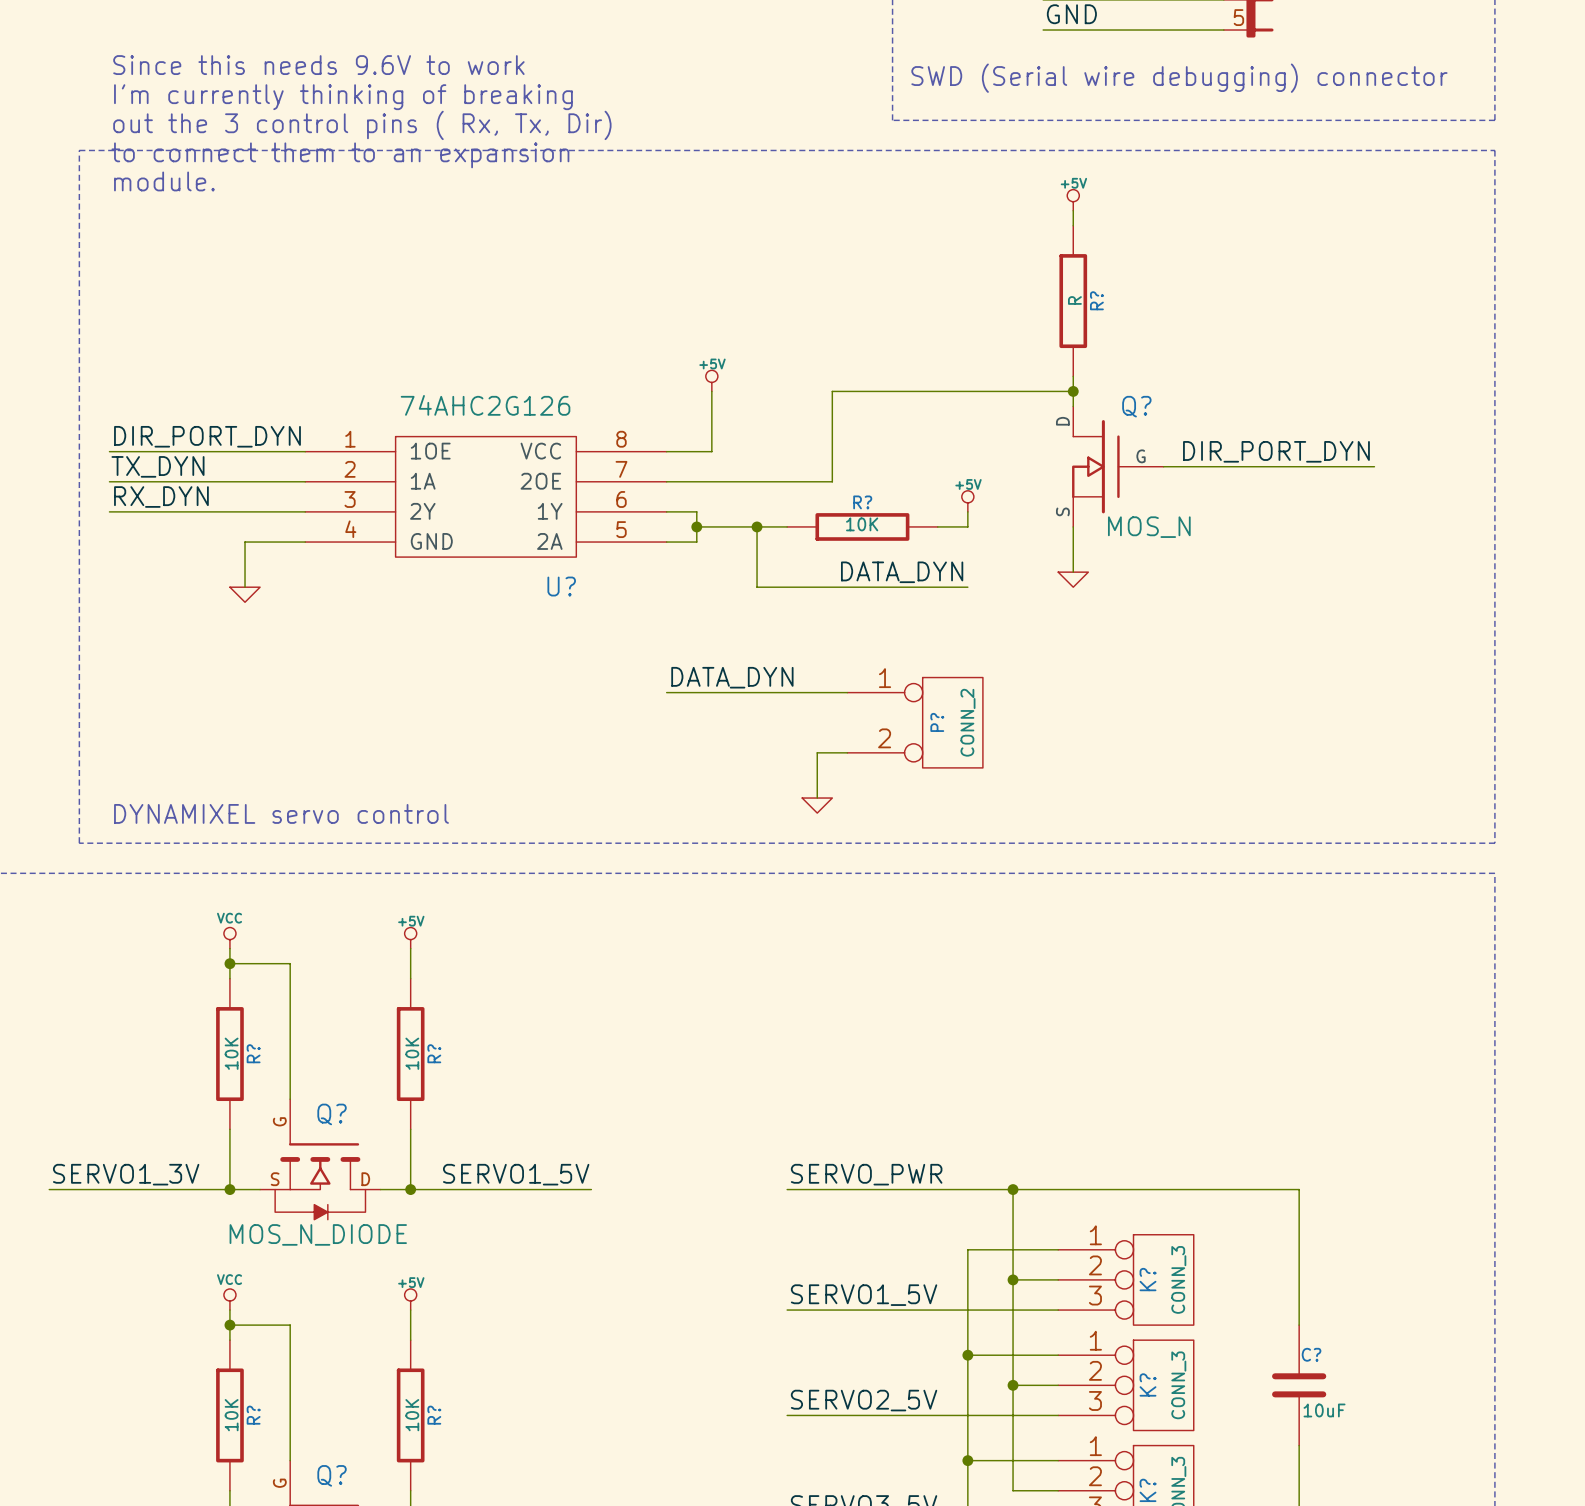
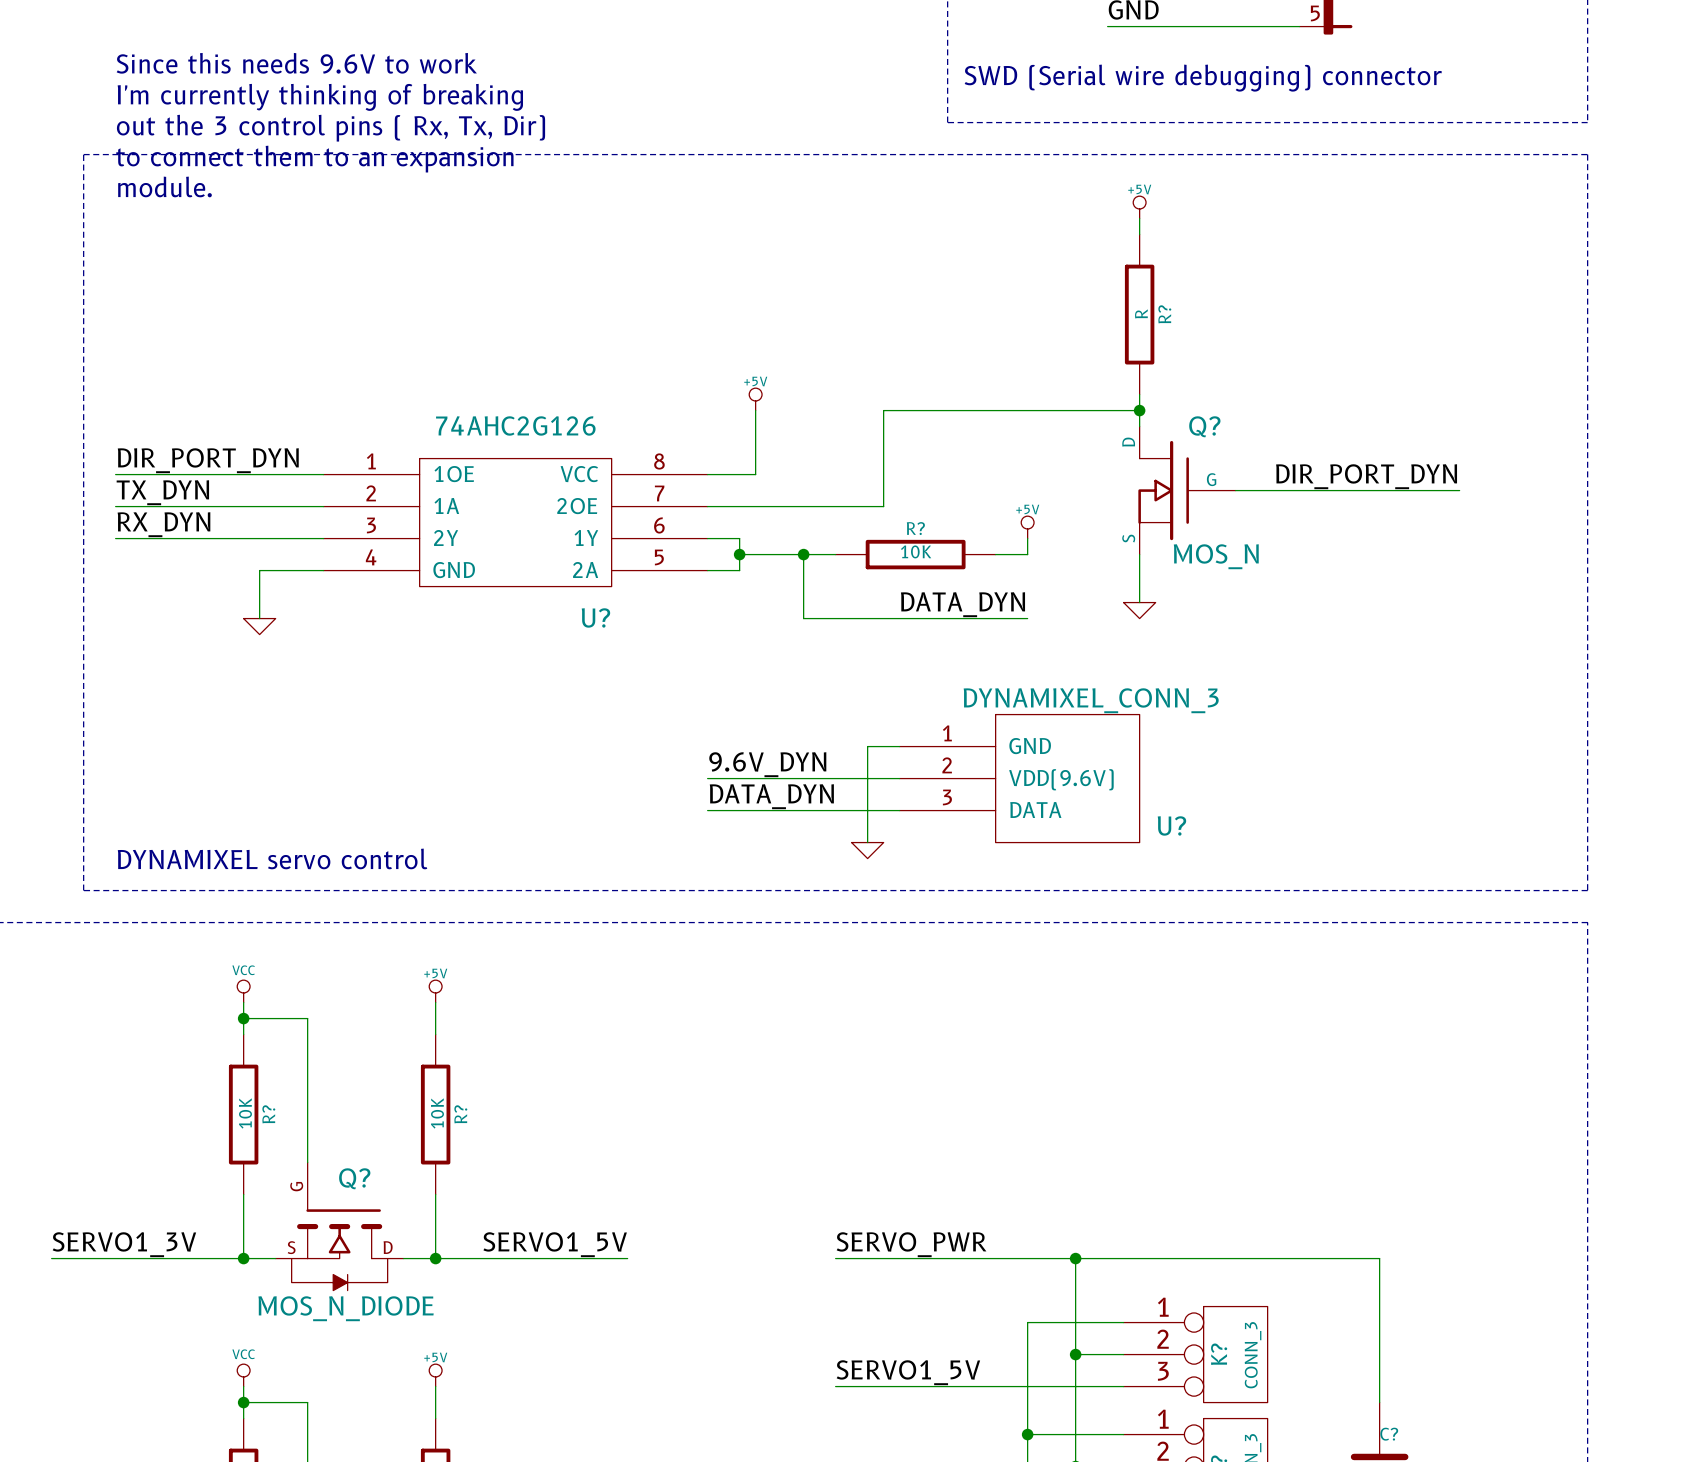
label position: DATA_DYN (732, 677) -> DATA_DYN (771, 796)
wire: (666, 692) (847, 692) -> (707, 778) (899, 778)
label: none -> 9.6V_DYN (767, 764)
P?: CONN_2 (915, 722) -> none
U?: none -> DYNAMIXEL_CONN_3 (1019, 778)
wire: (817, 752) (847, 752) -> (867, 794) (867, 746) (899, 746)
wire: none -> (707, 810) (899, 810)

